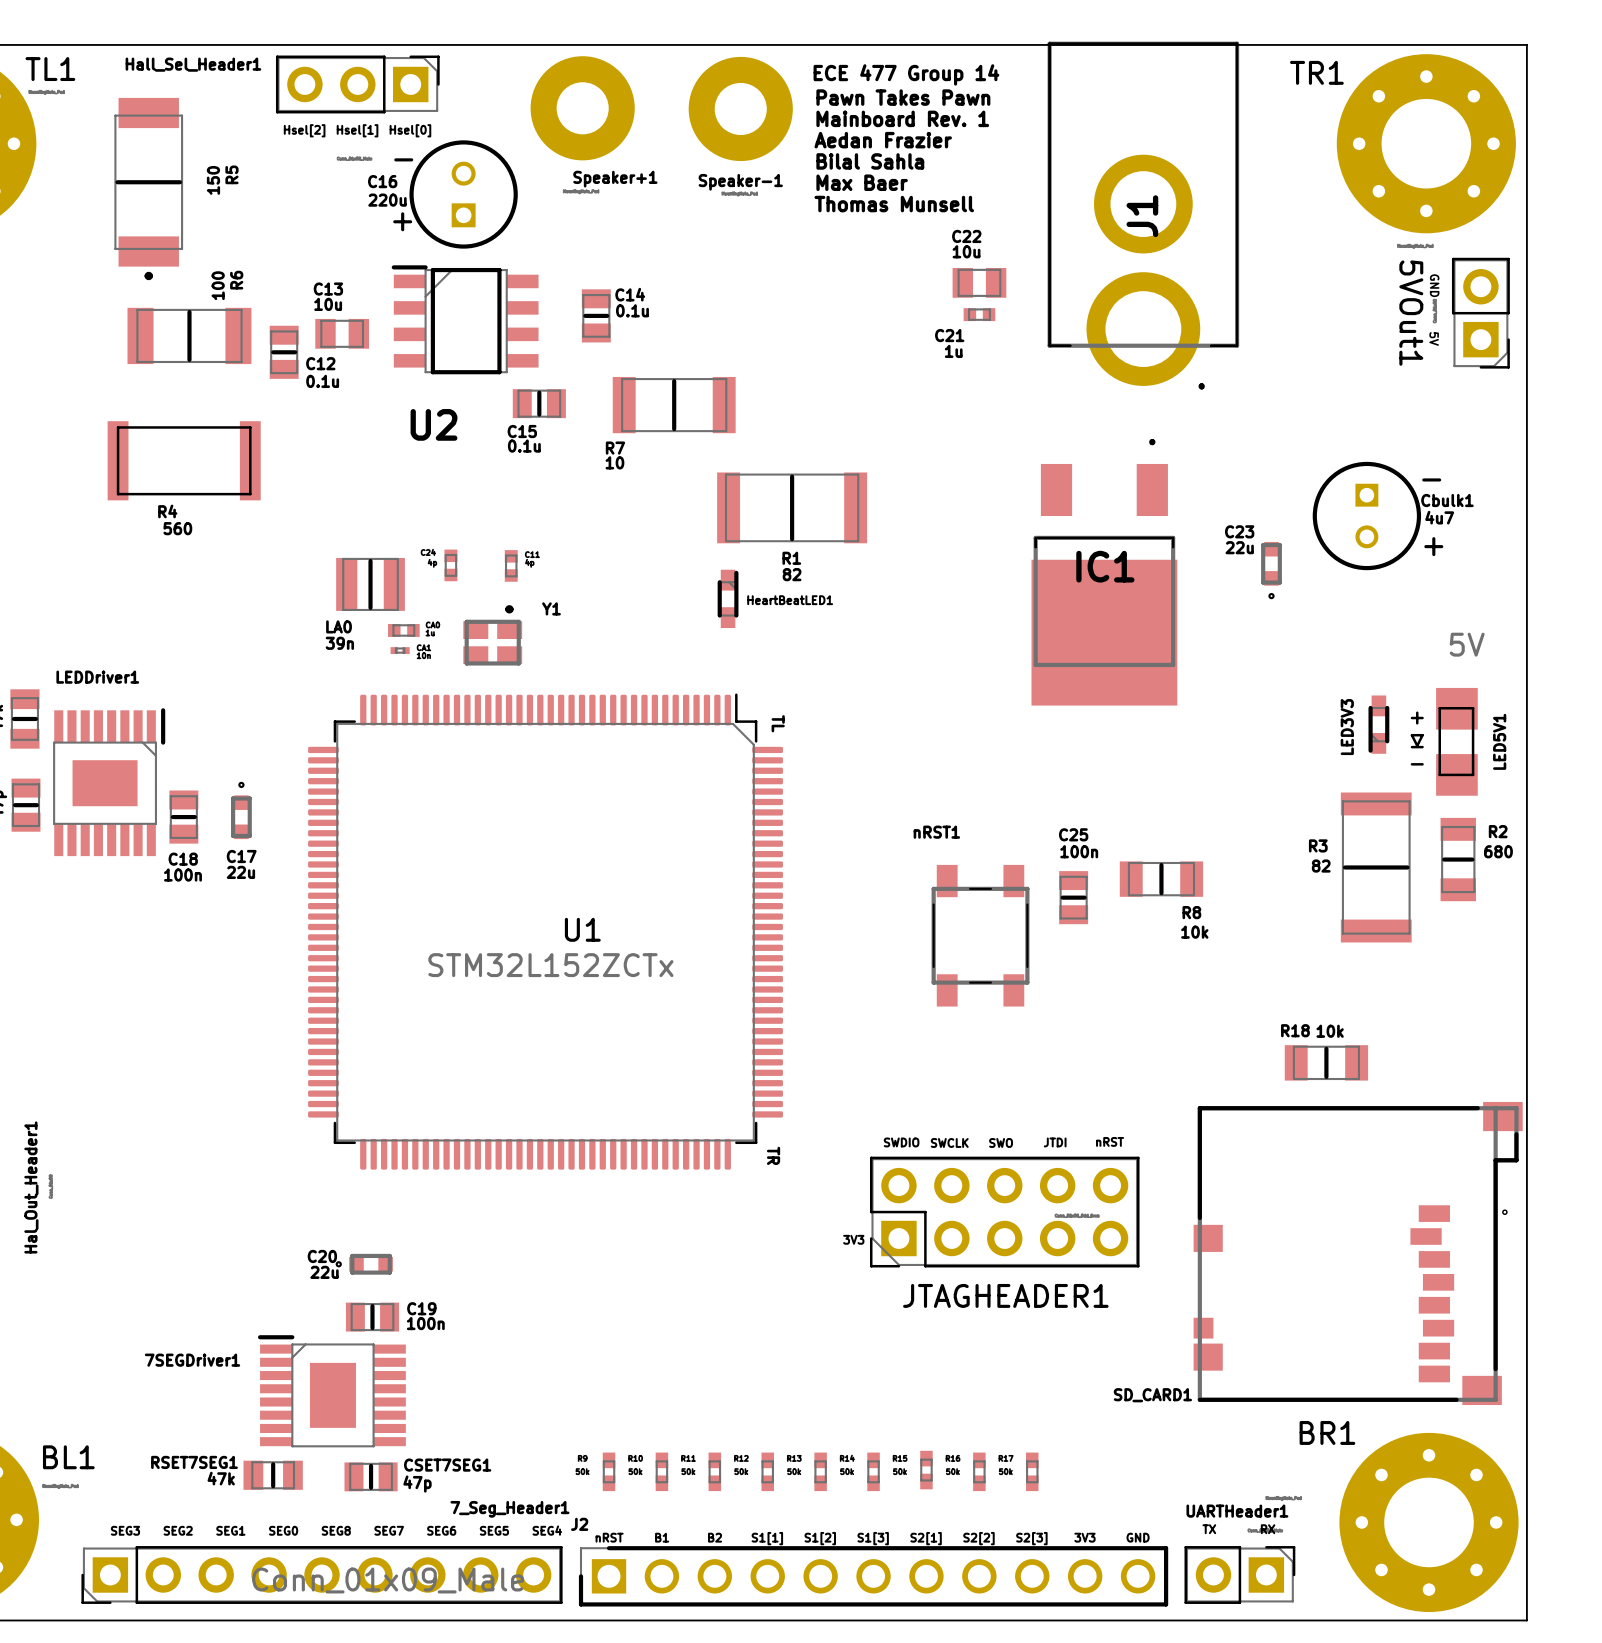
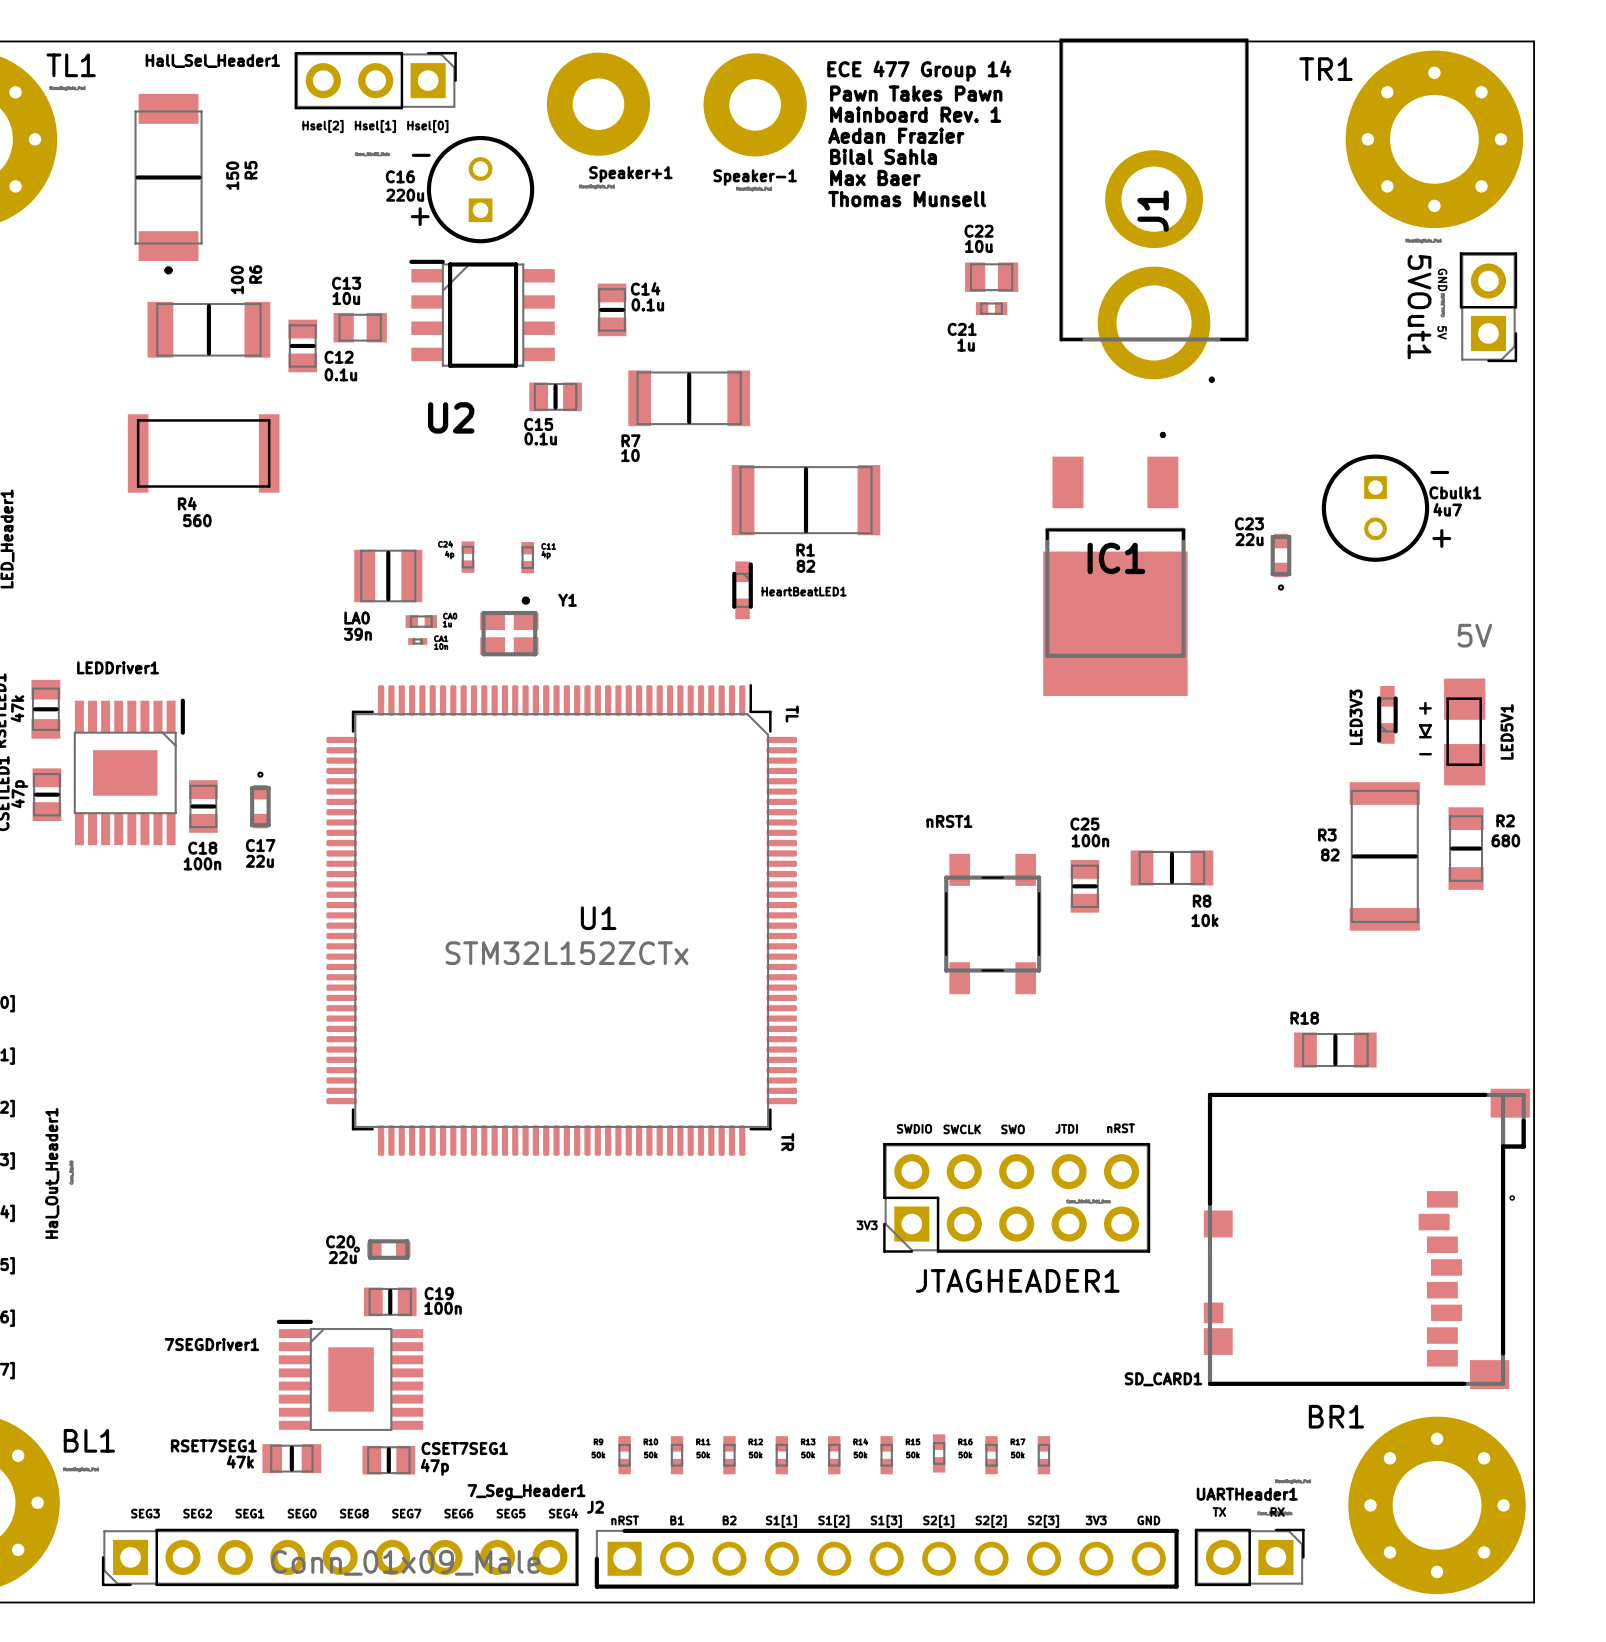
R18 value: 10k (1330, 1031) -> none

